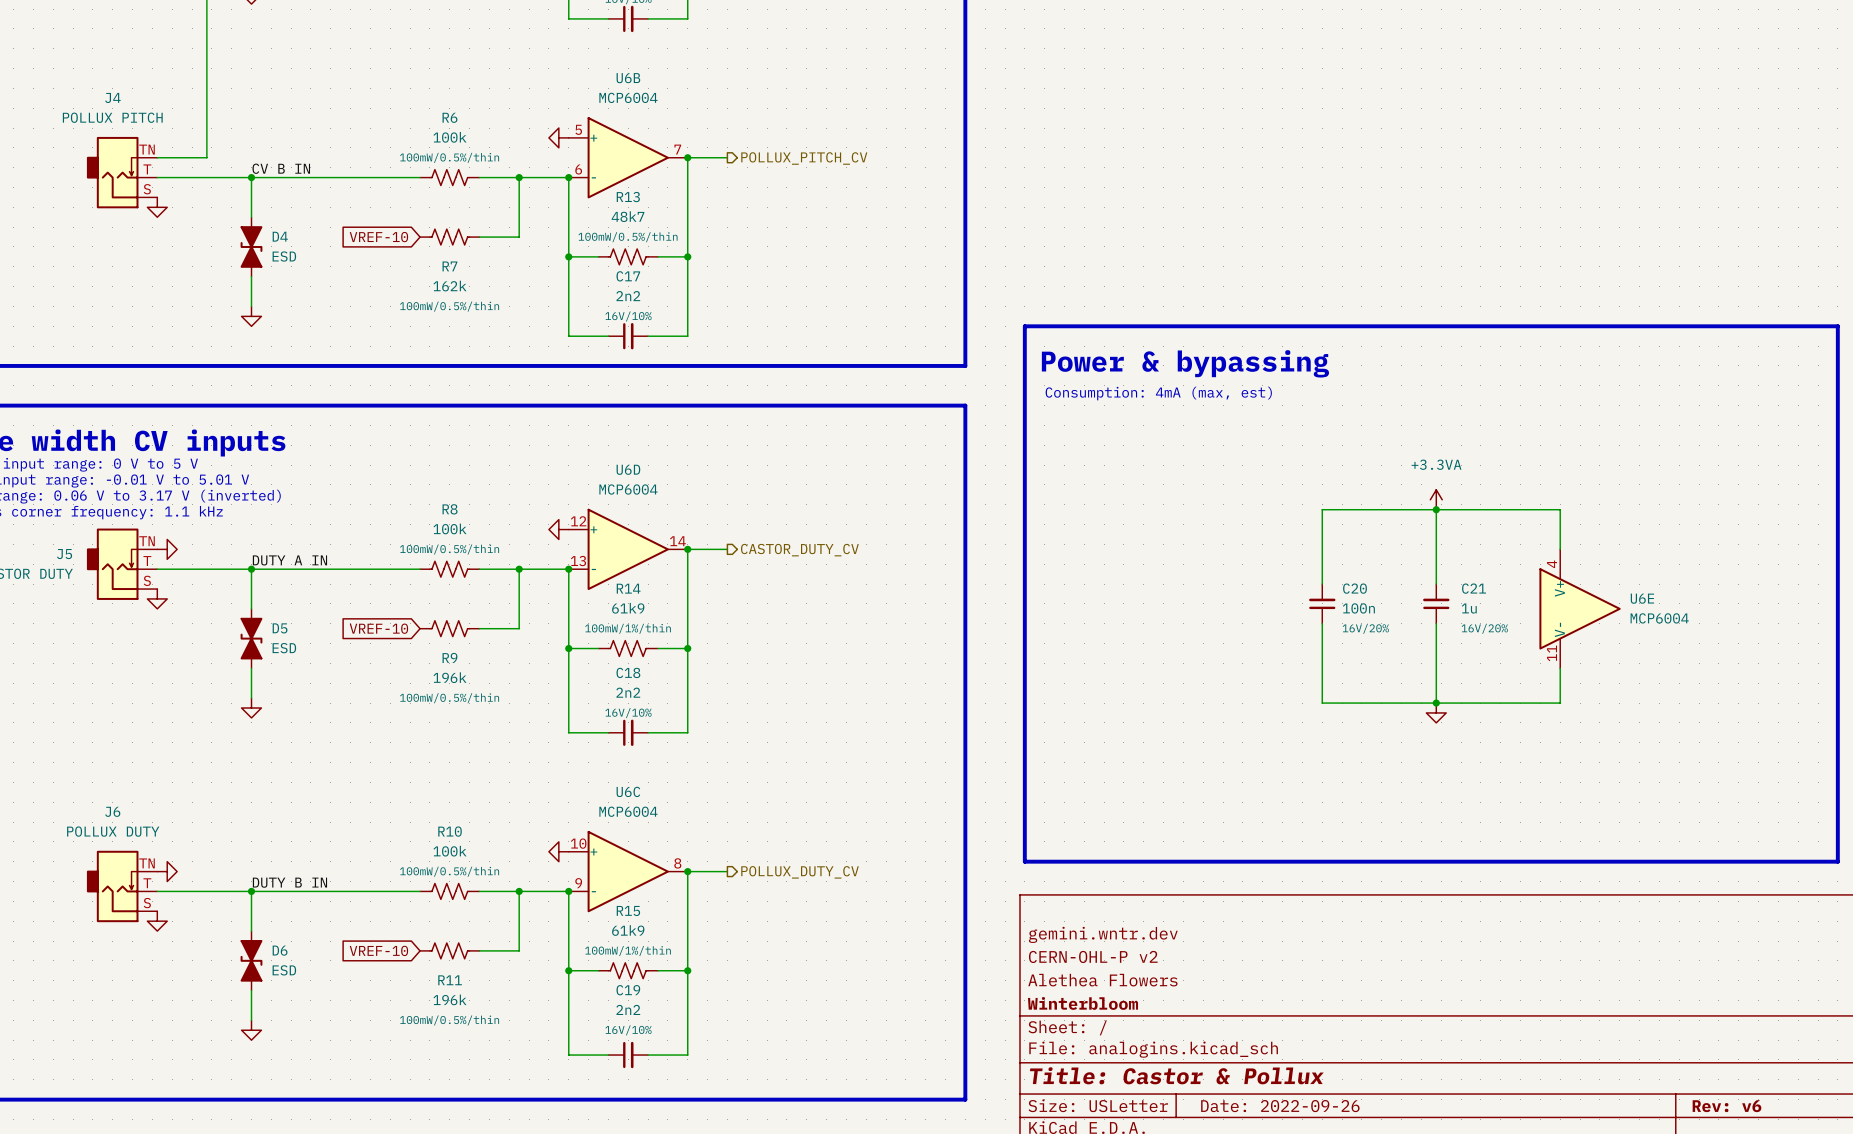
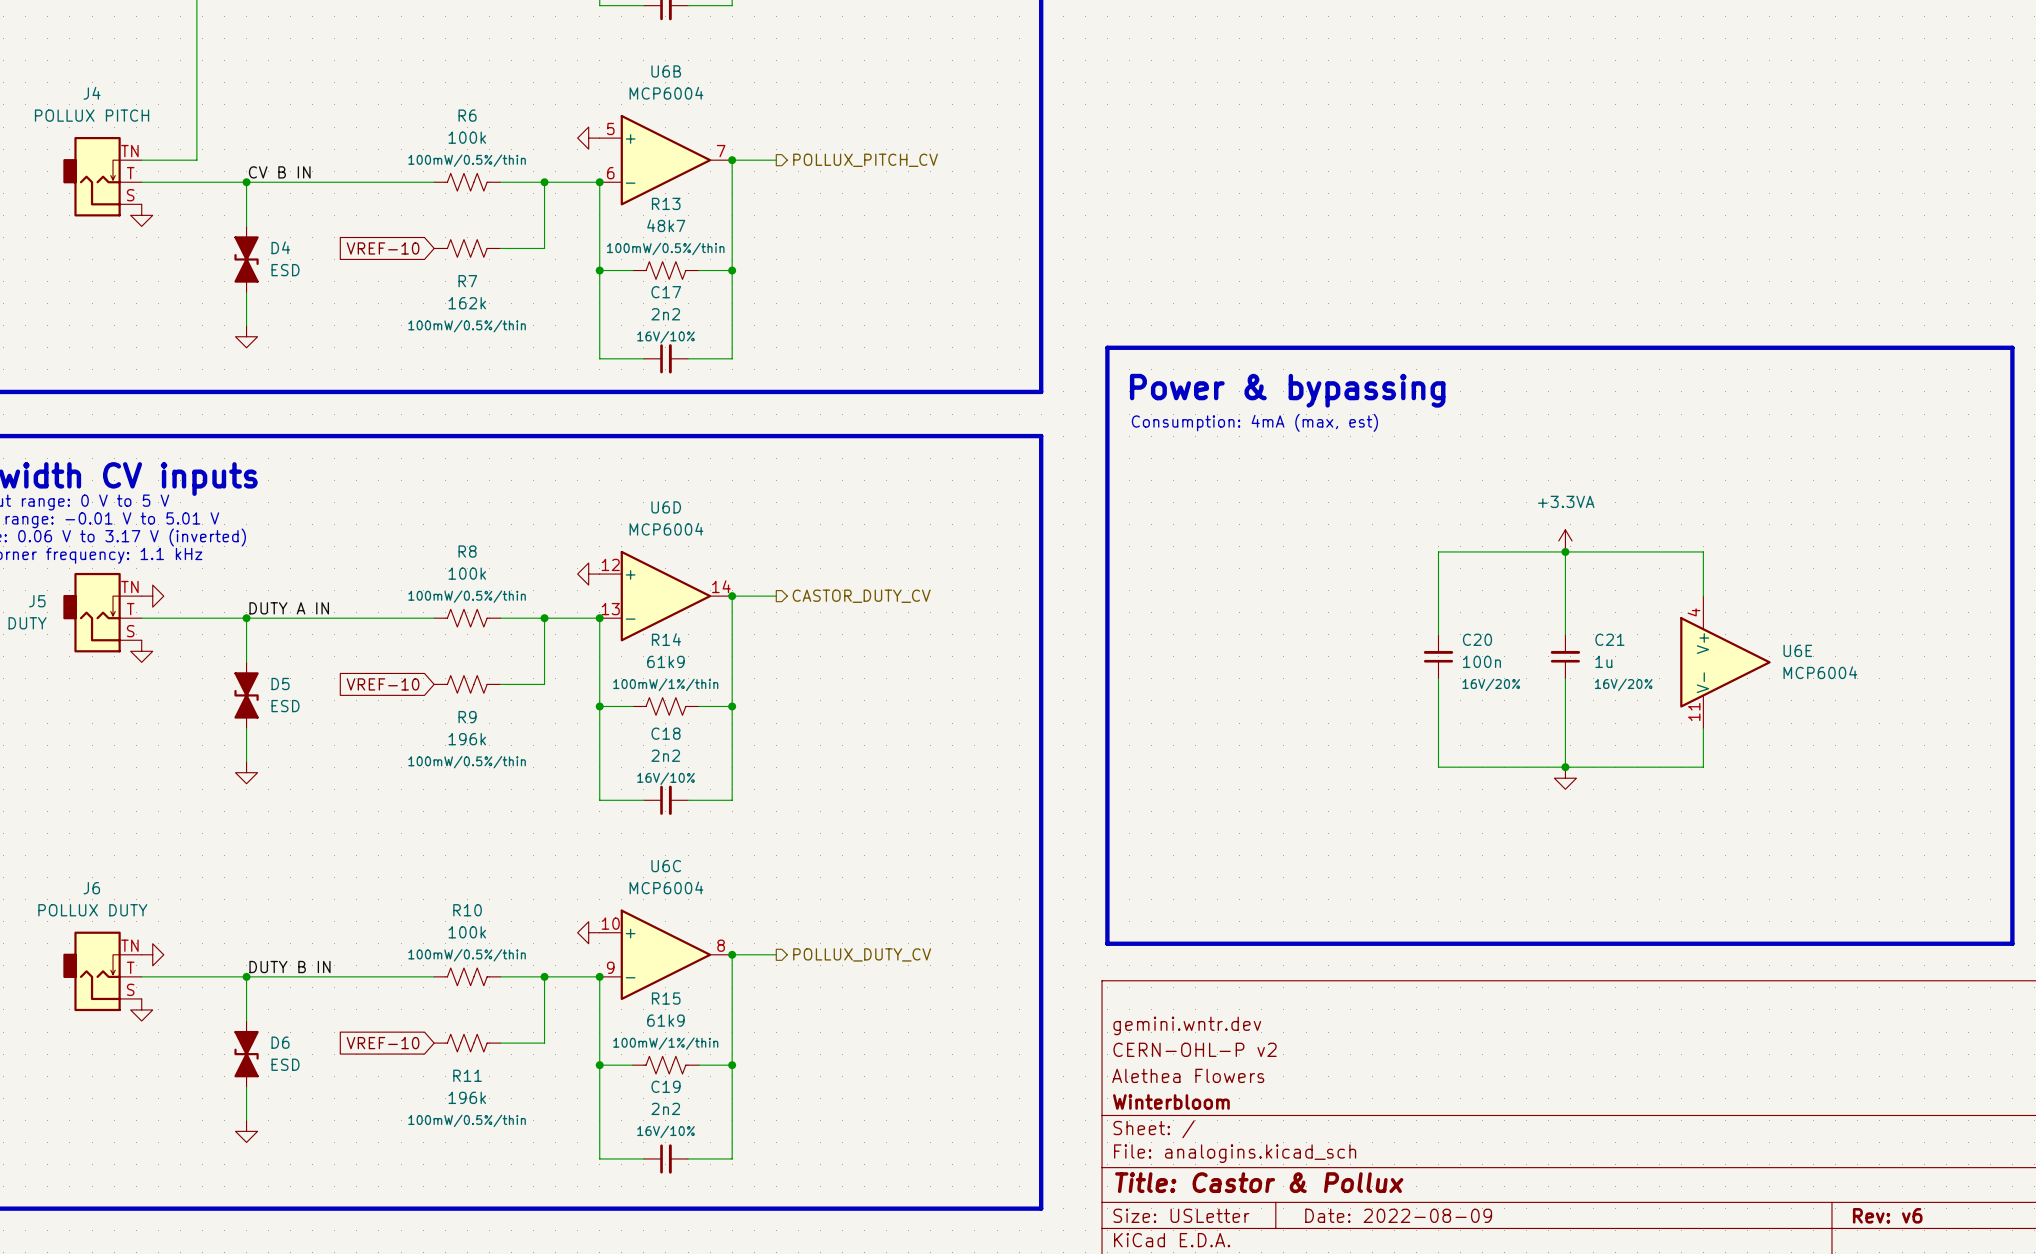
title block: Date: 2022-09-26 (1280, 1106) -> Date: 2022-08-09 (1398, 1215)

